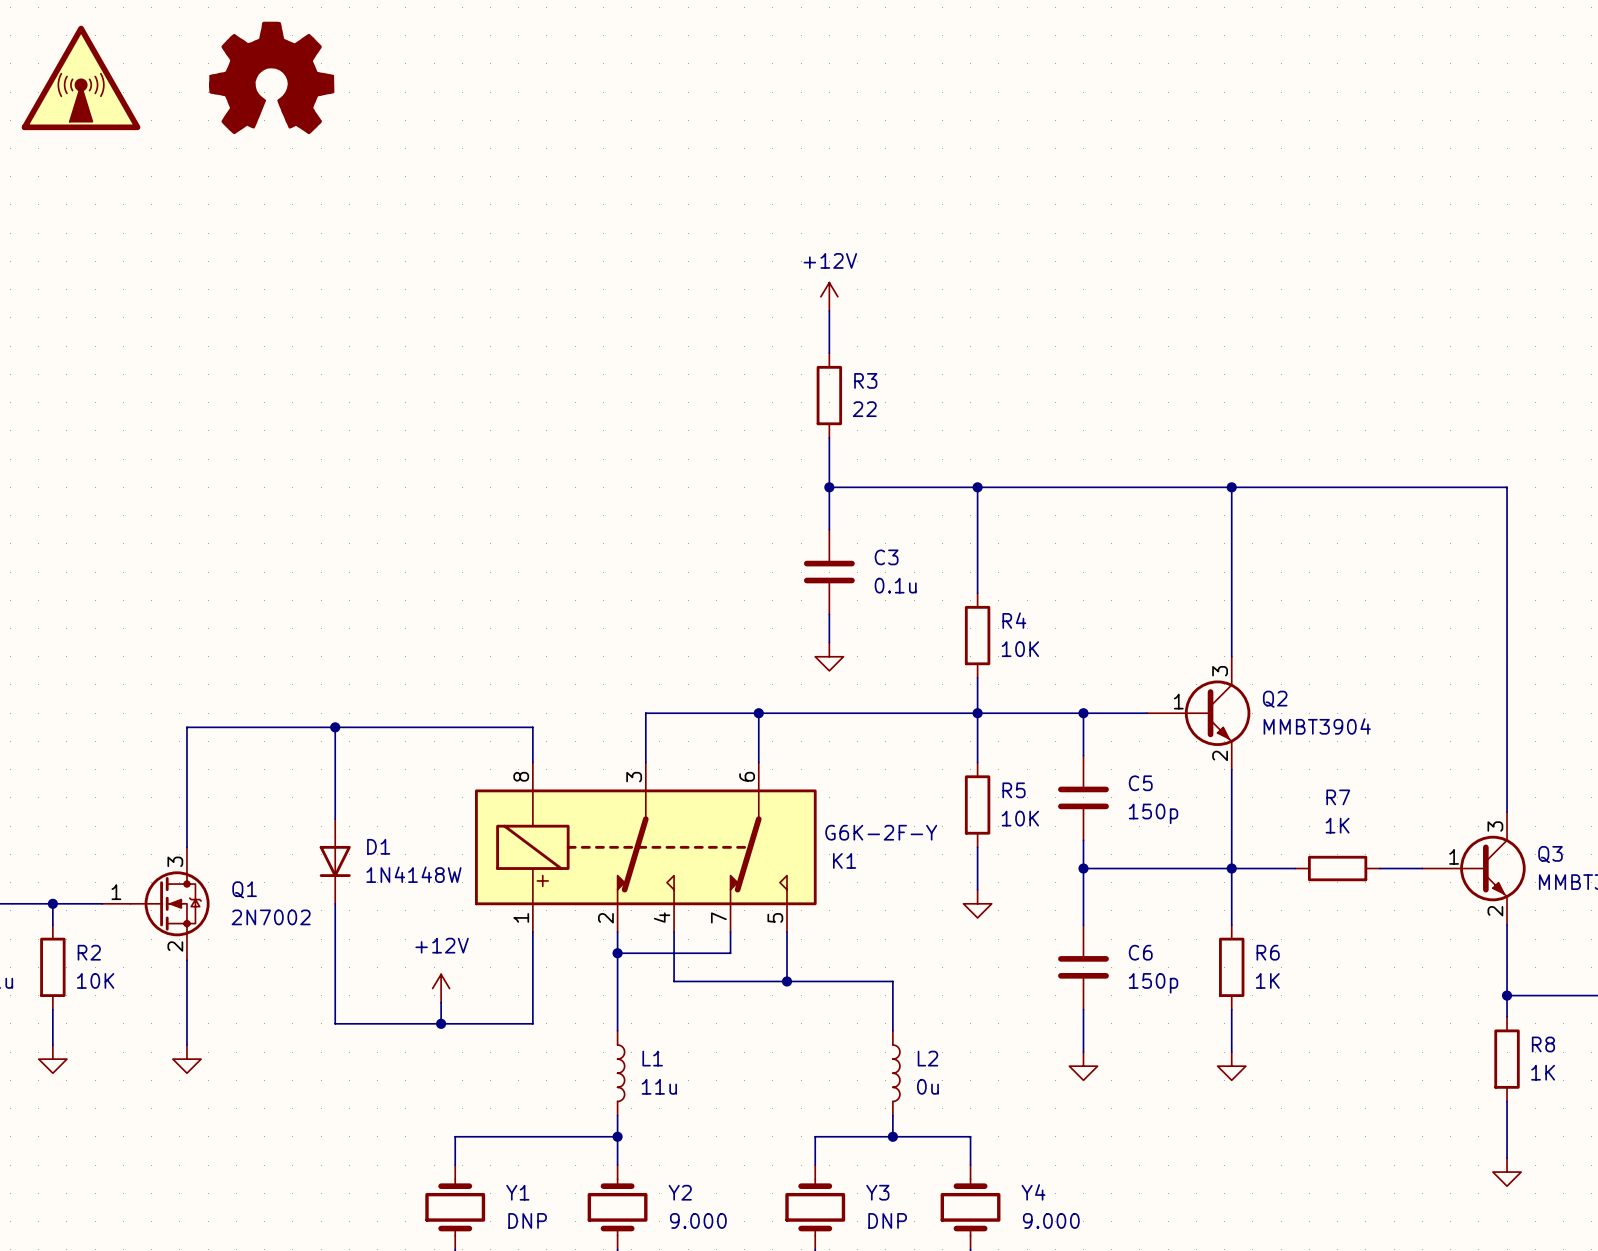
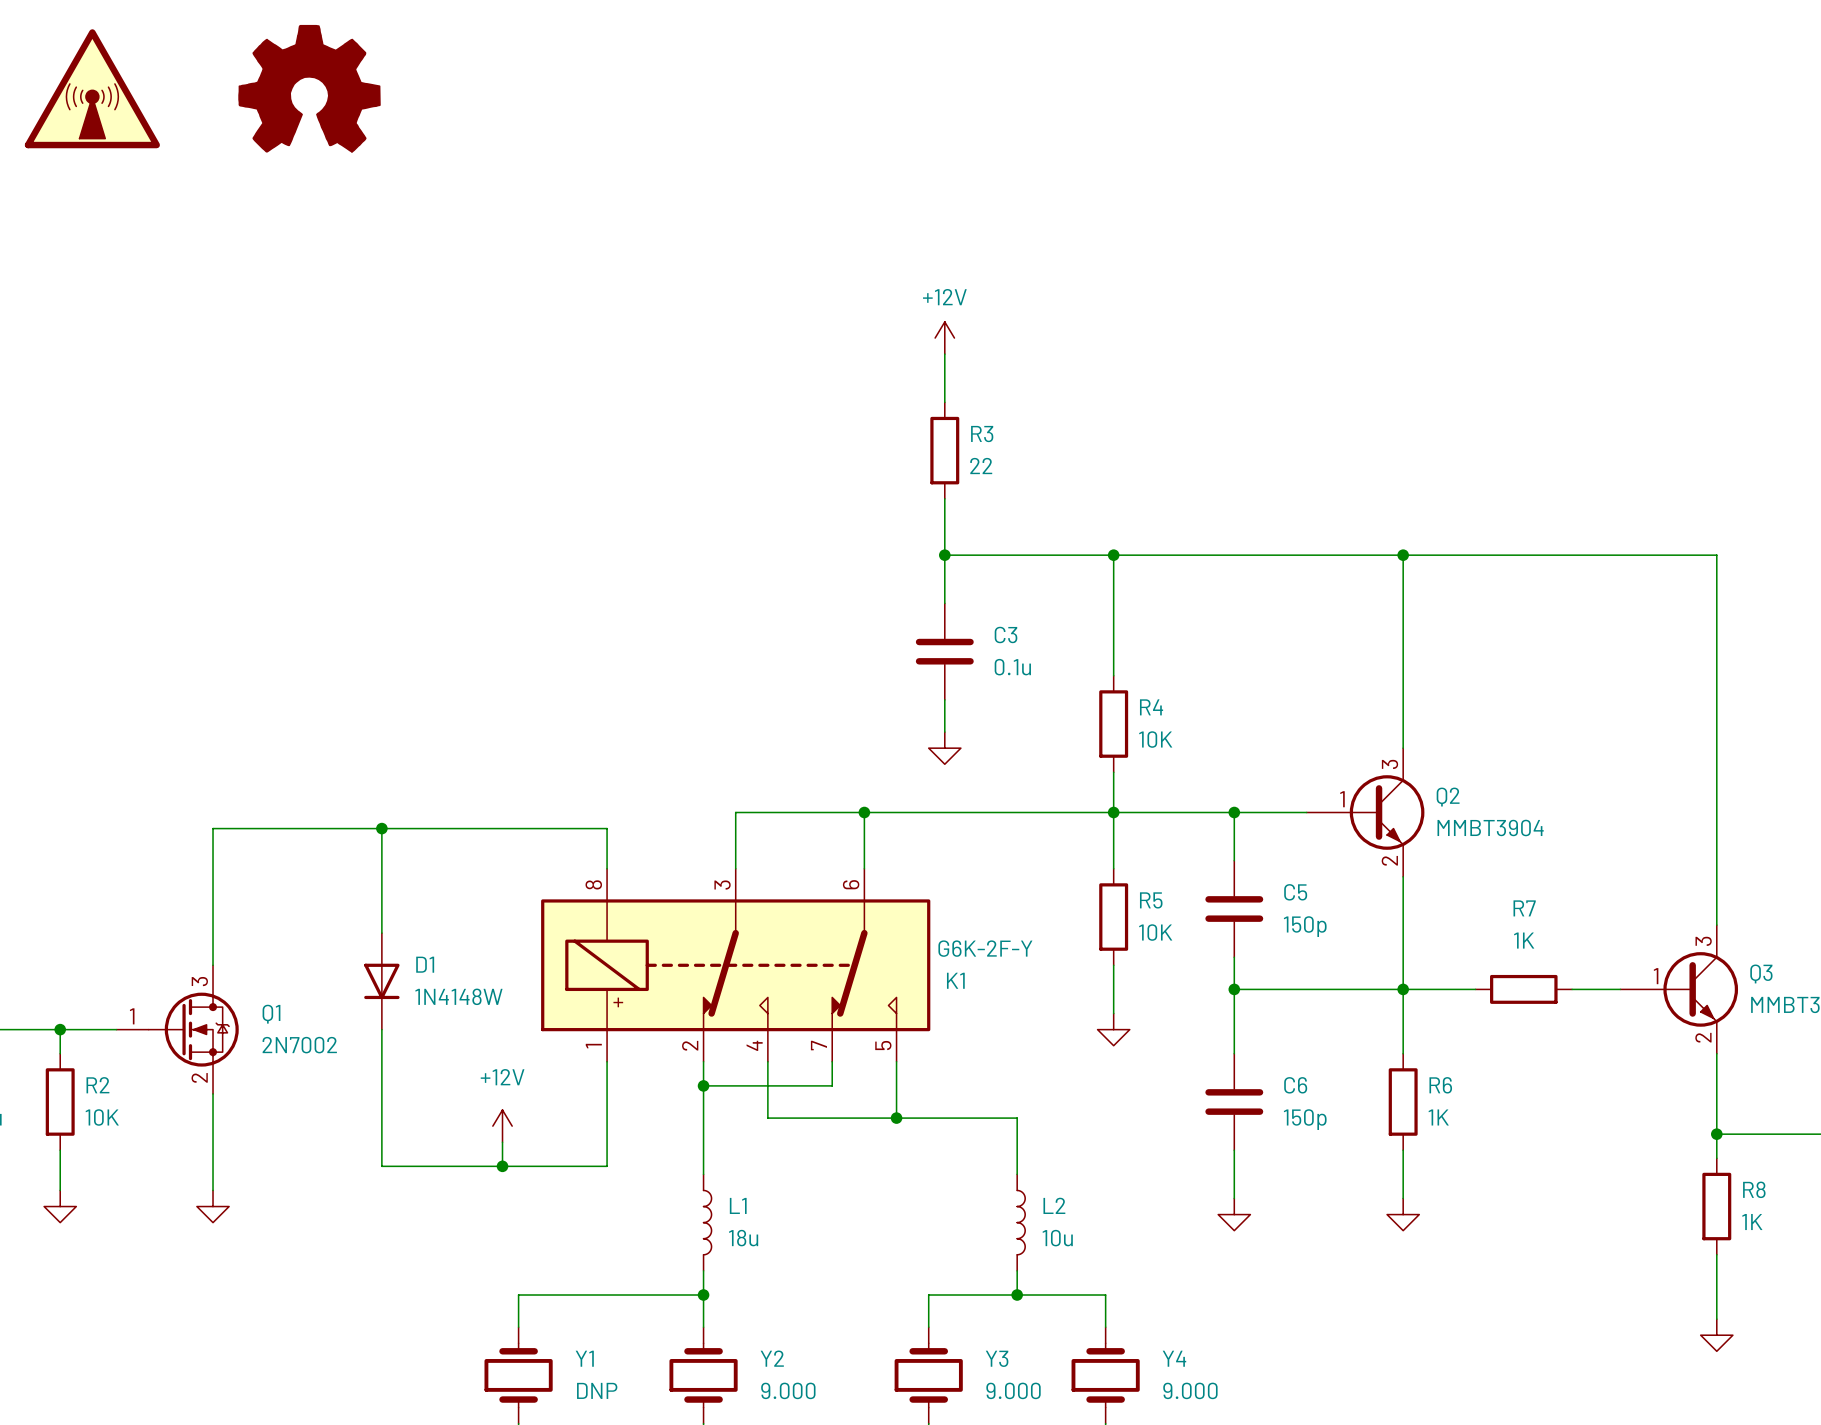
L1 value: 11u (659, 1086) -> 18u (743, 1238)
L2 value: 0u (927, 1086) -> 10u (1057, 1238)
Y3 value: DNP (887, 1220) -> 9.000 (1013, 1390)

